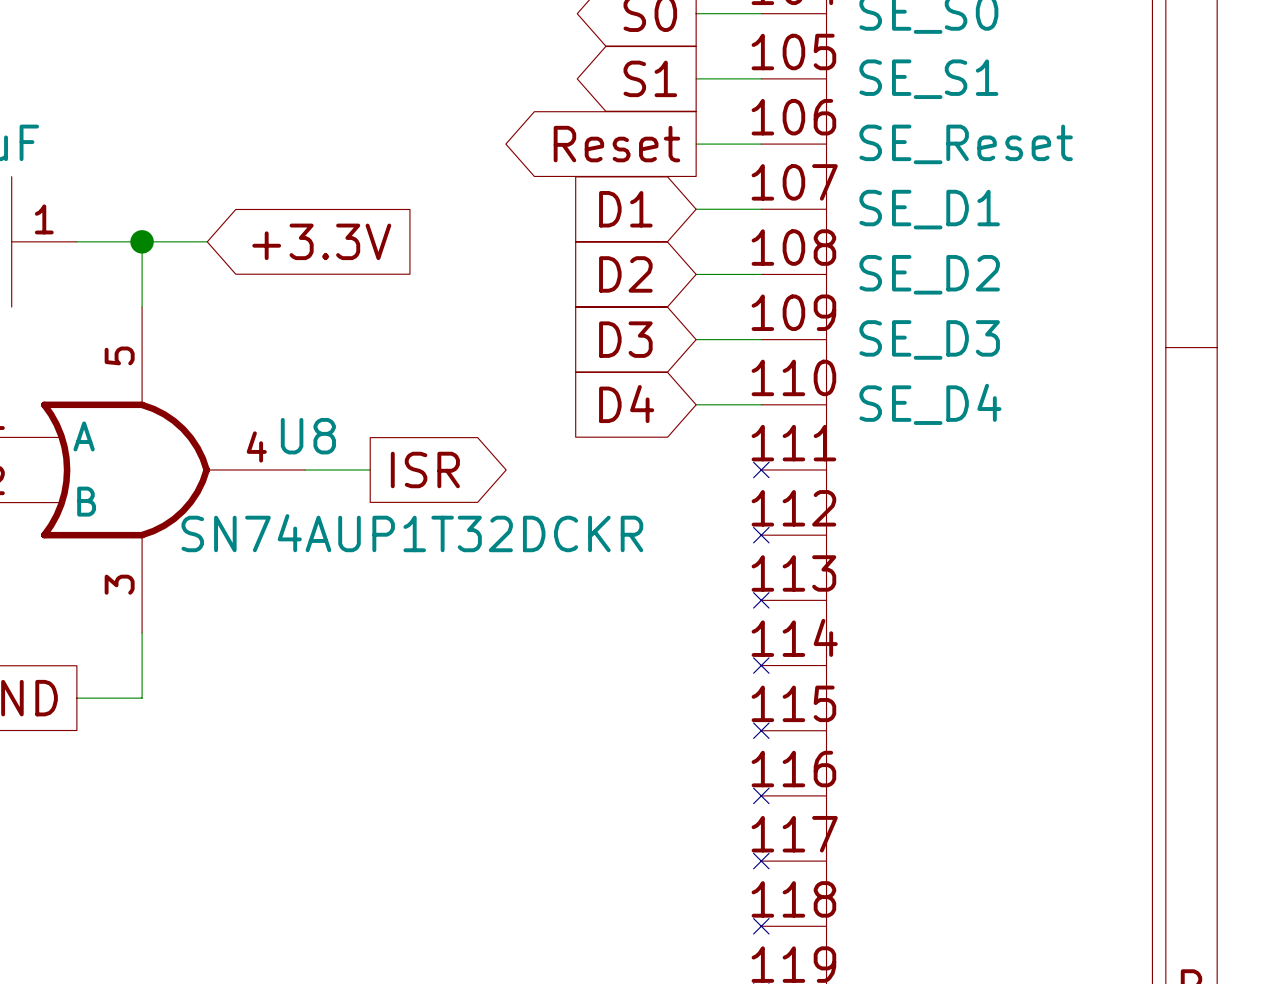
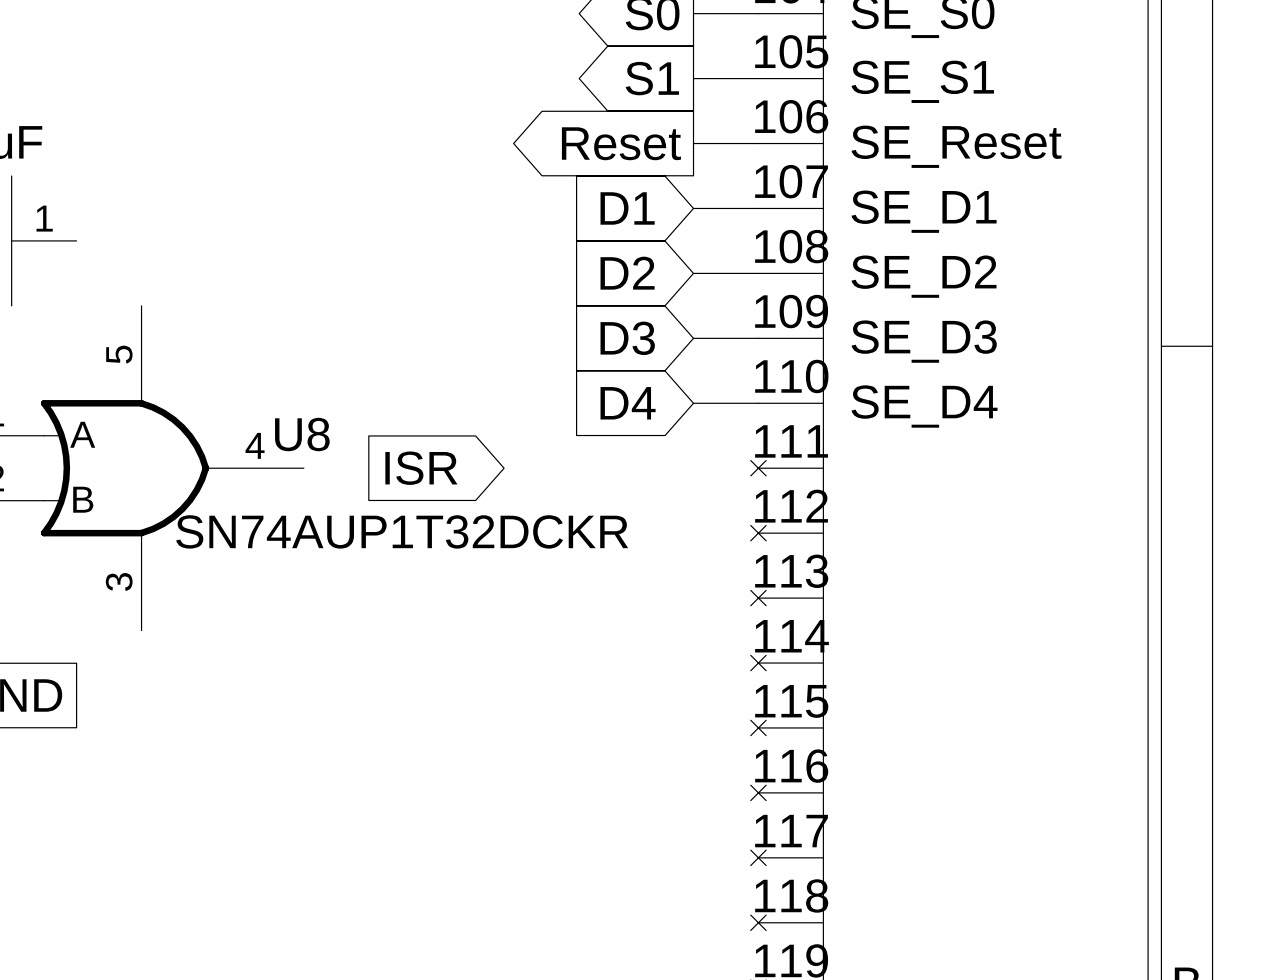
wire: (76, 241) (207, 241) -> none
wire: (142, 241) (142, 307) -> none
junction: (142, 241) -> none
global label: +3.3V (321, 241) -> none
wire: (305, 469) (370, 469) -> none
wire: (142, 632) (142, 698) (76, 698) -> none

